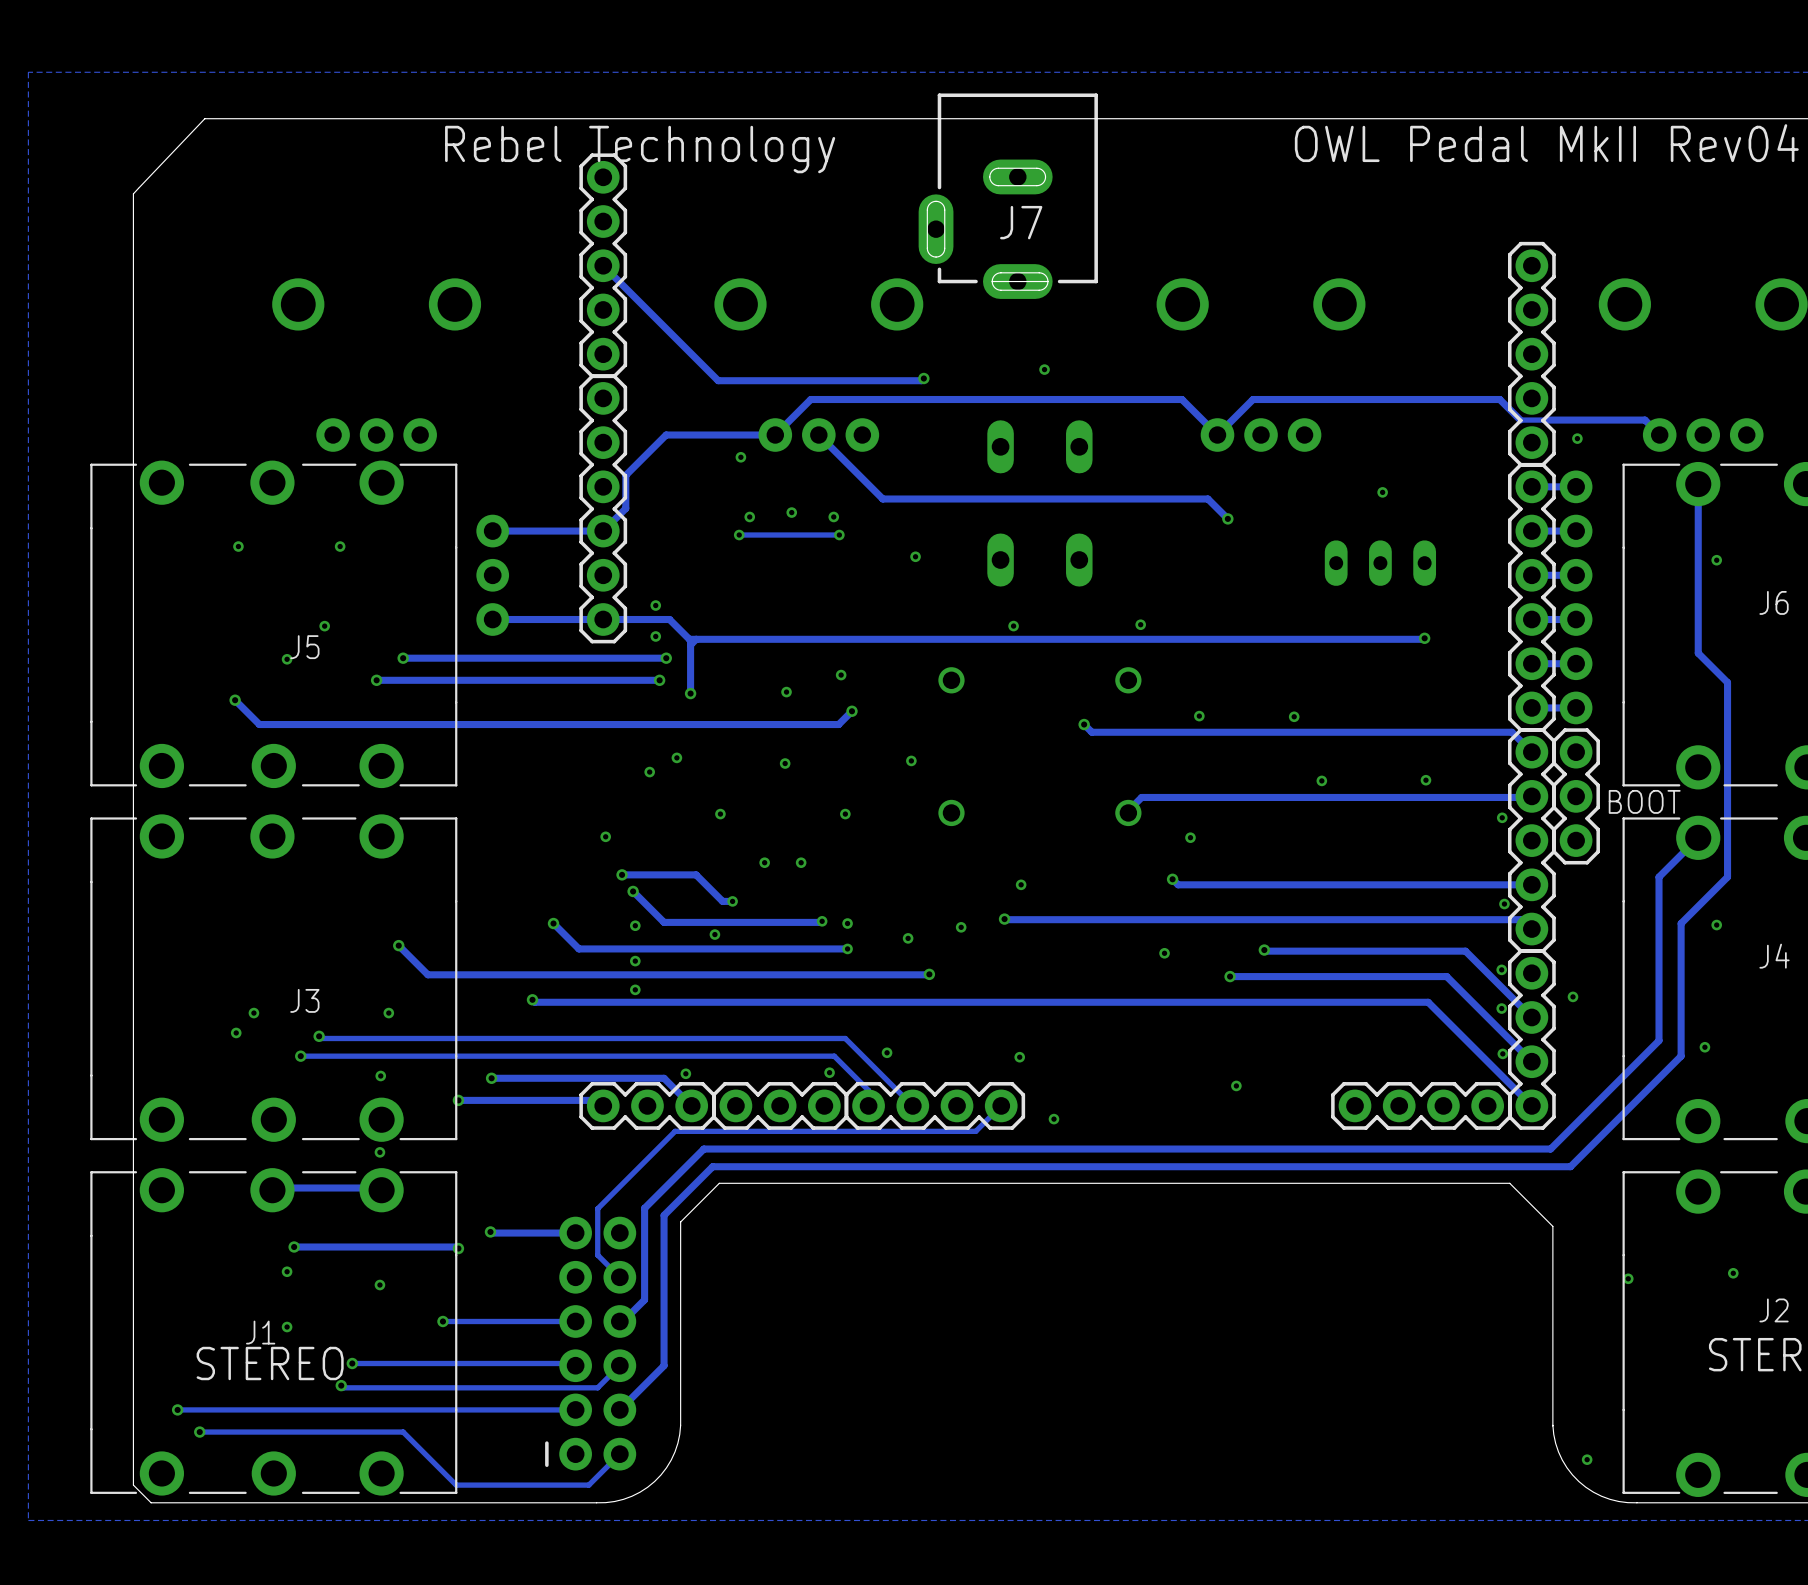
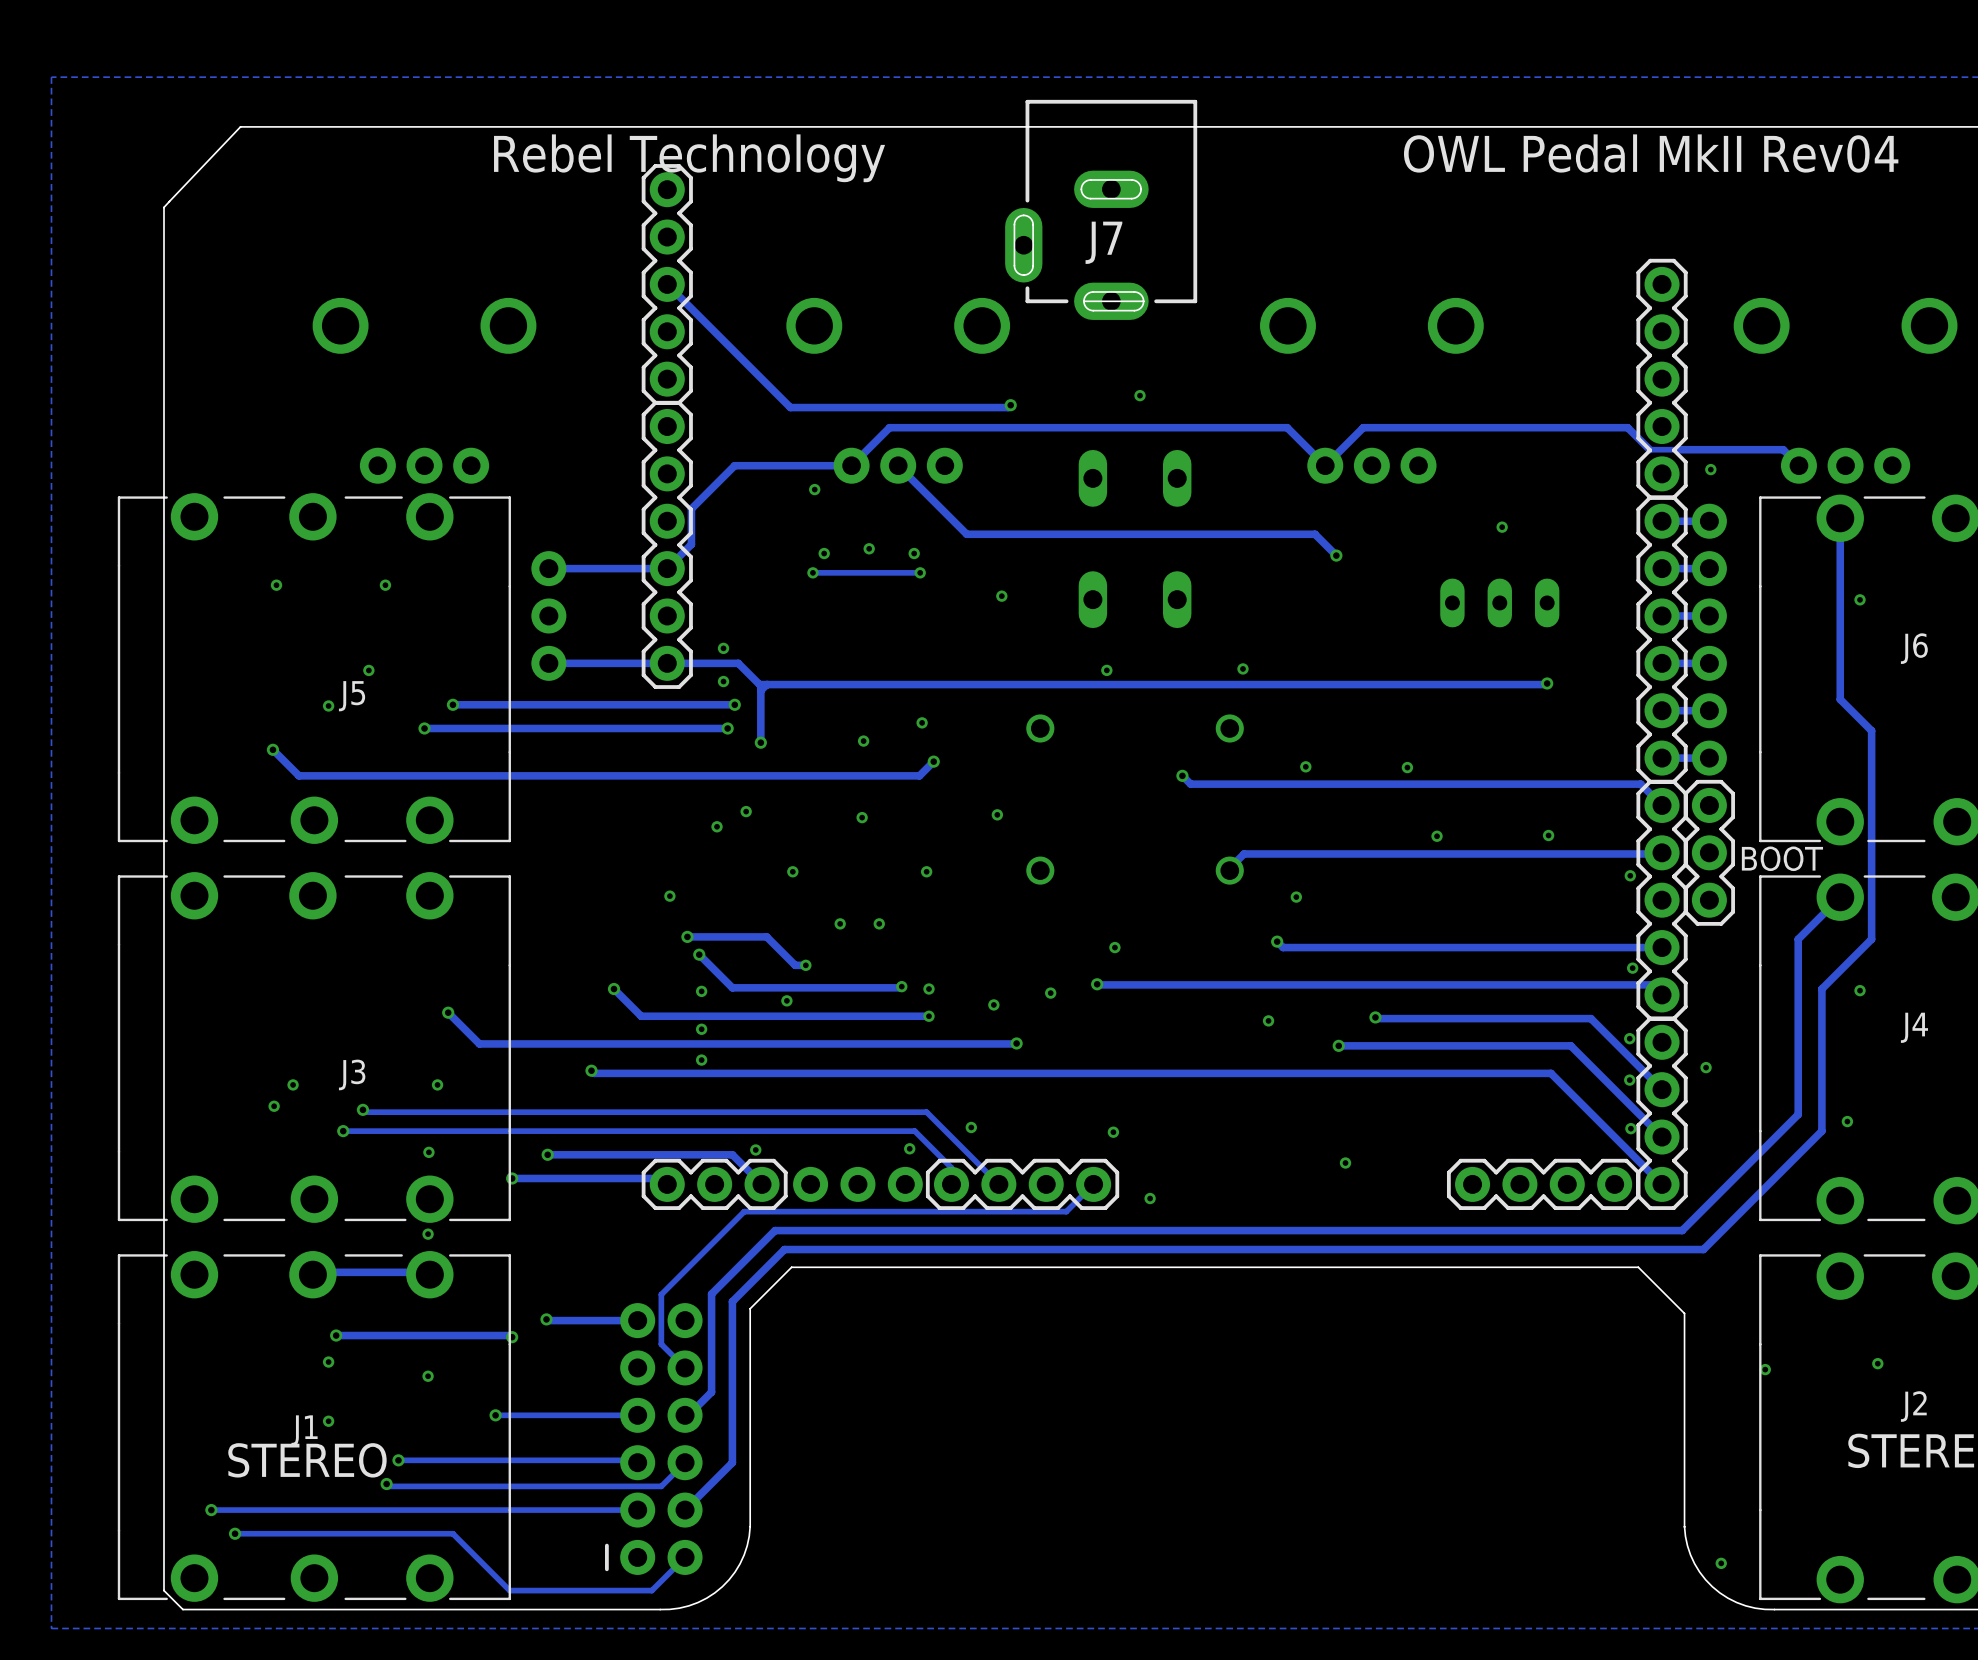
part side: bottom (780, 1105) -> top (857, 1184)

